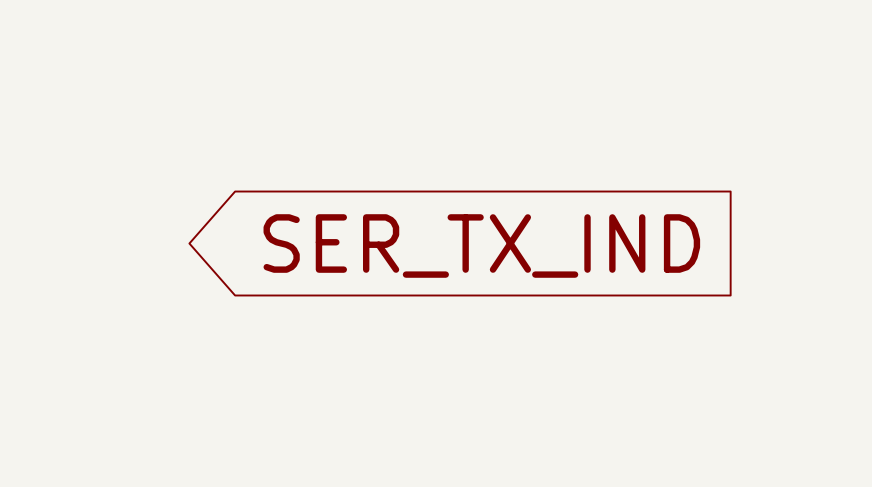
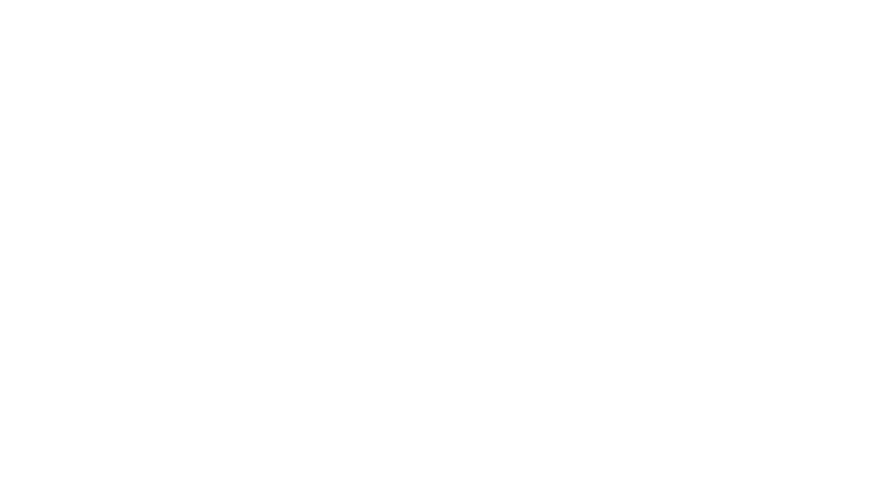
global label: SER_TX_IND (481, 245) -> none

